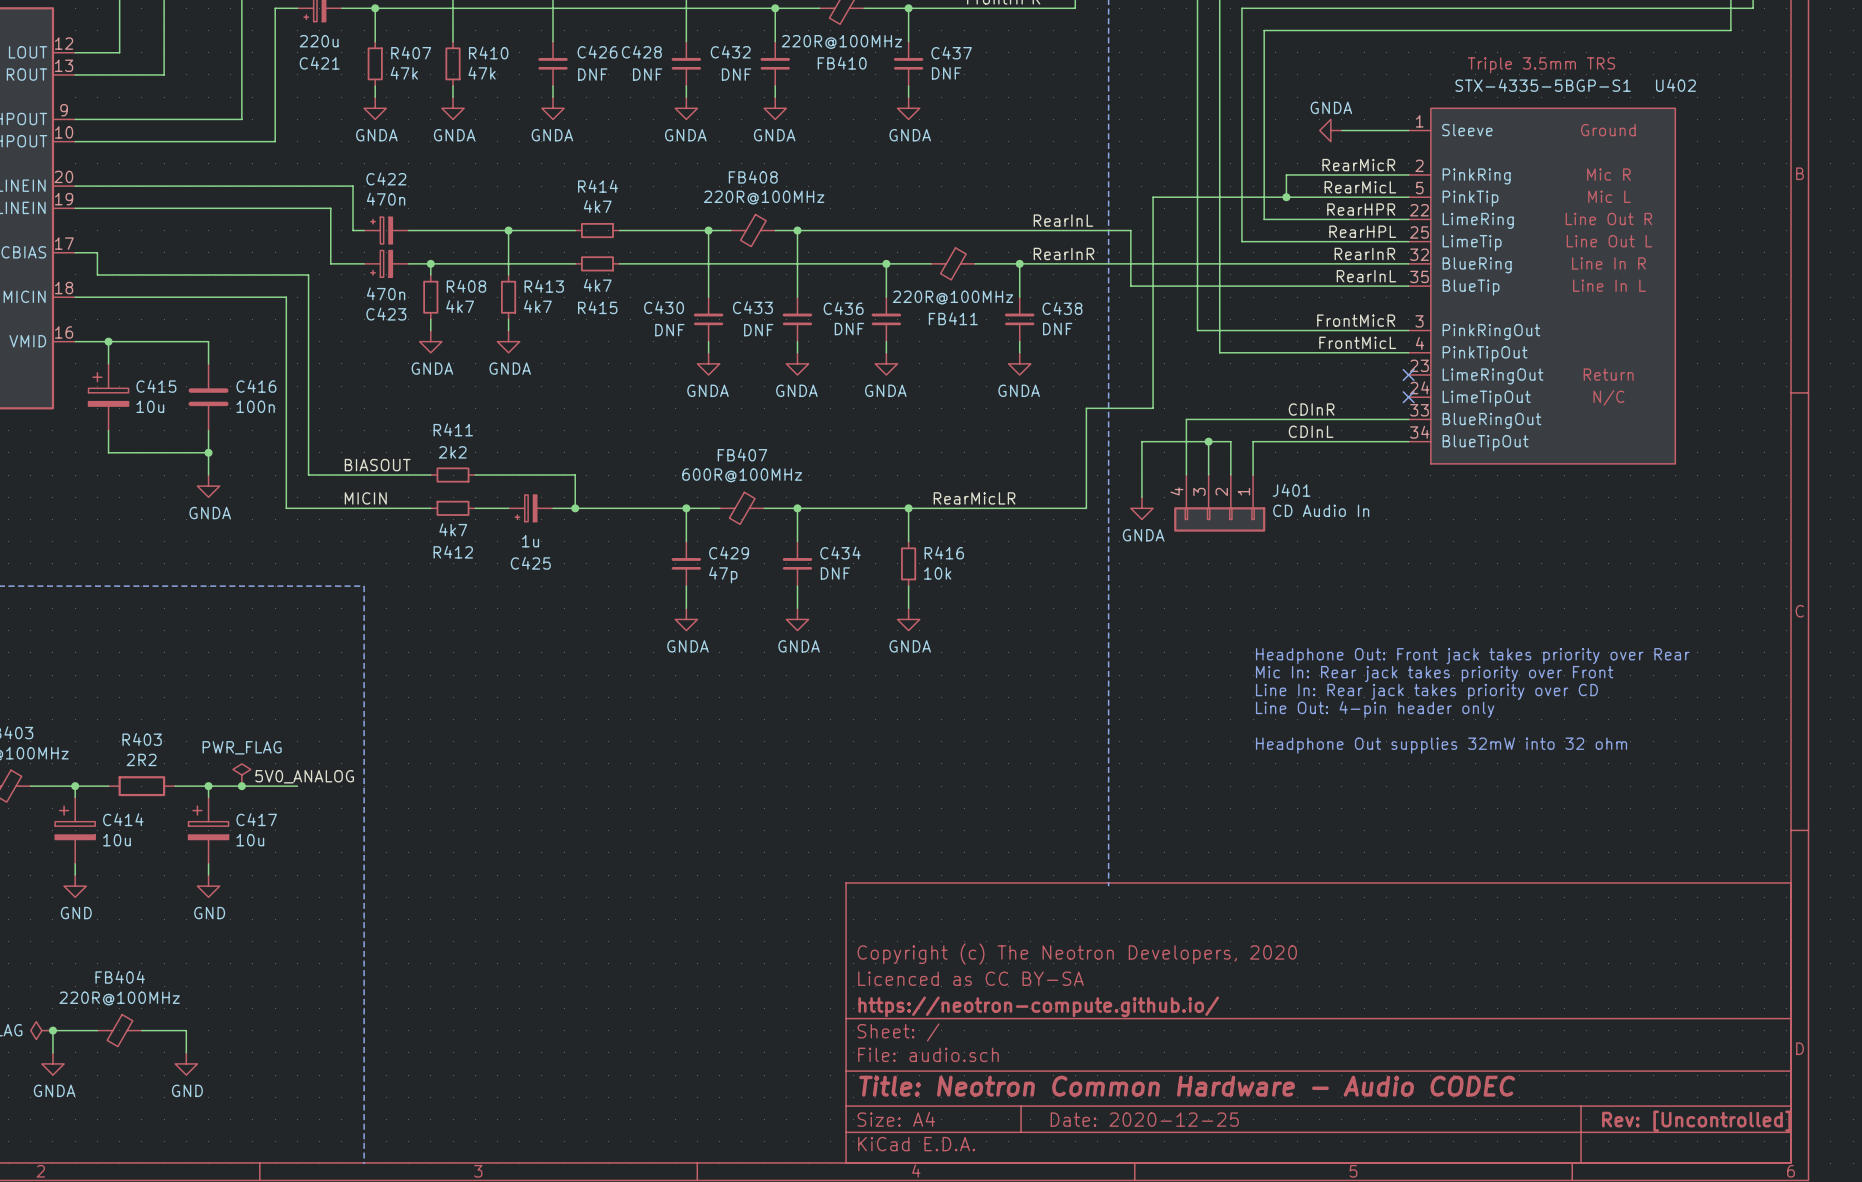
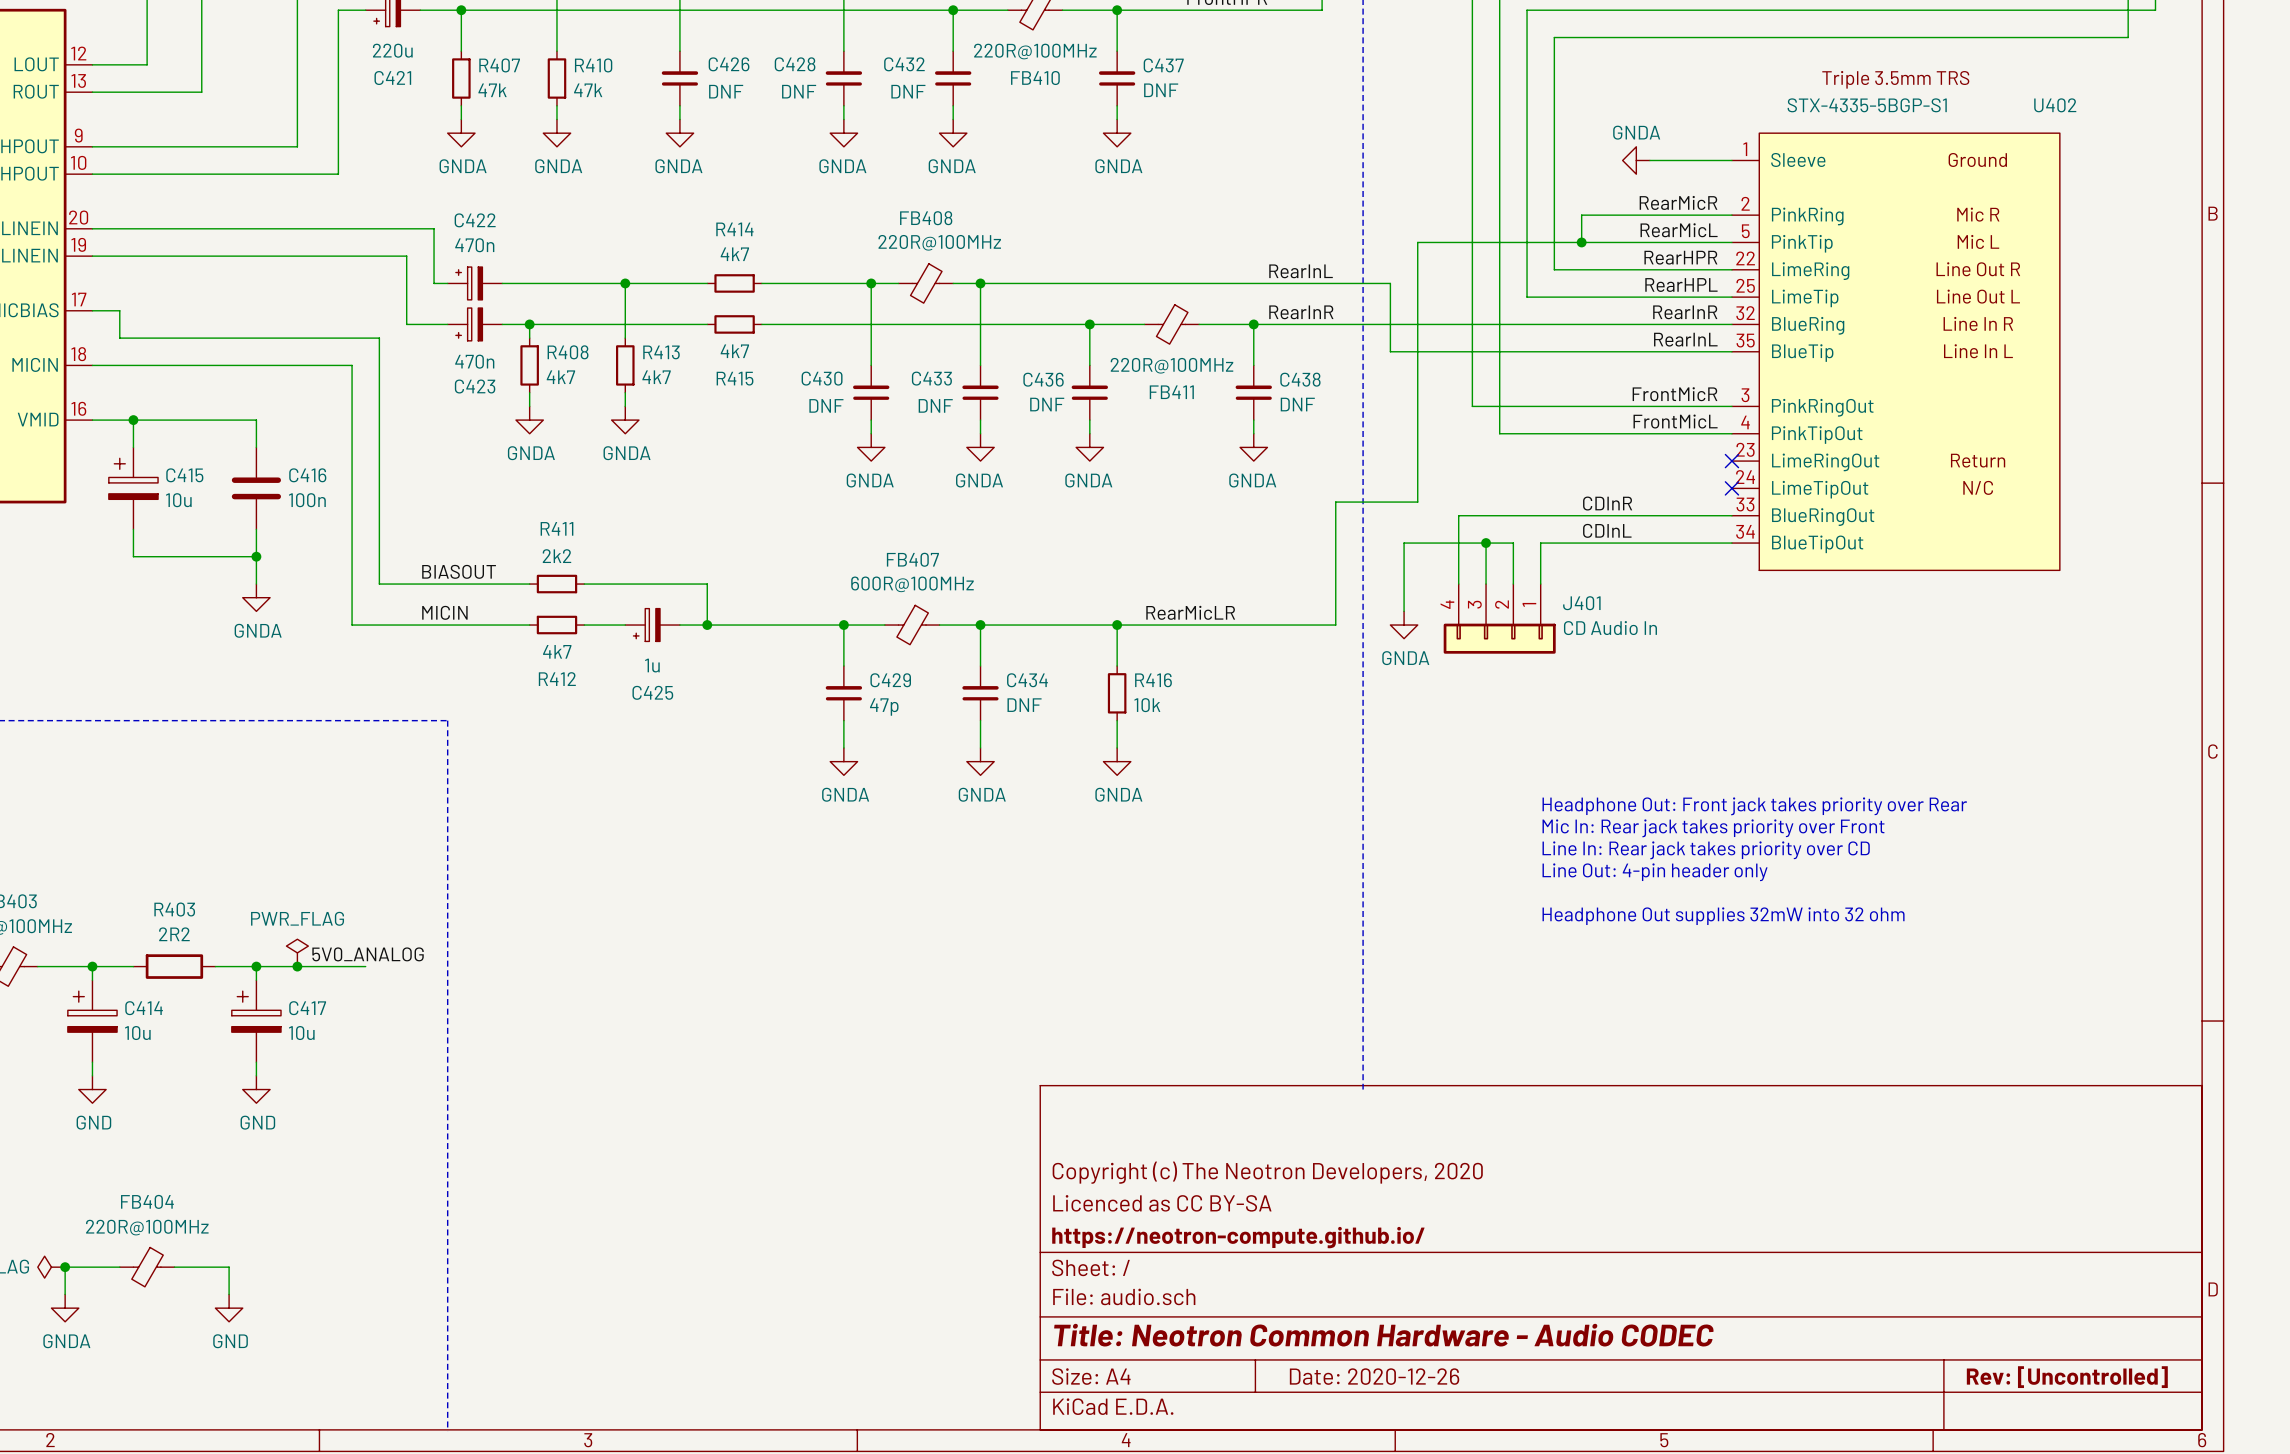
title block: Date: 2020-12-25 (1144, 1119) -> Date: 2020-12-26 (1374, 1376)

